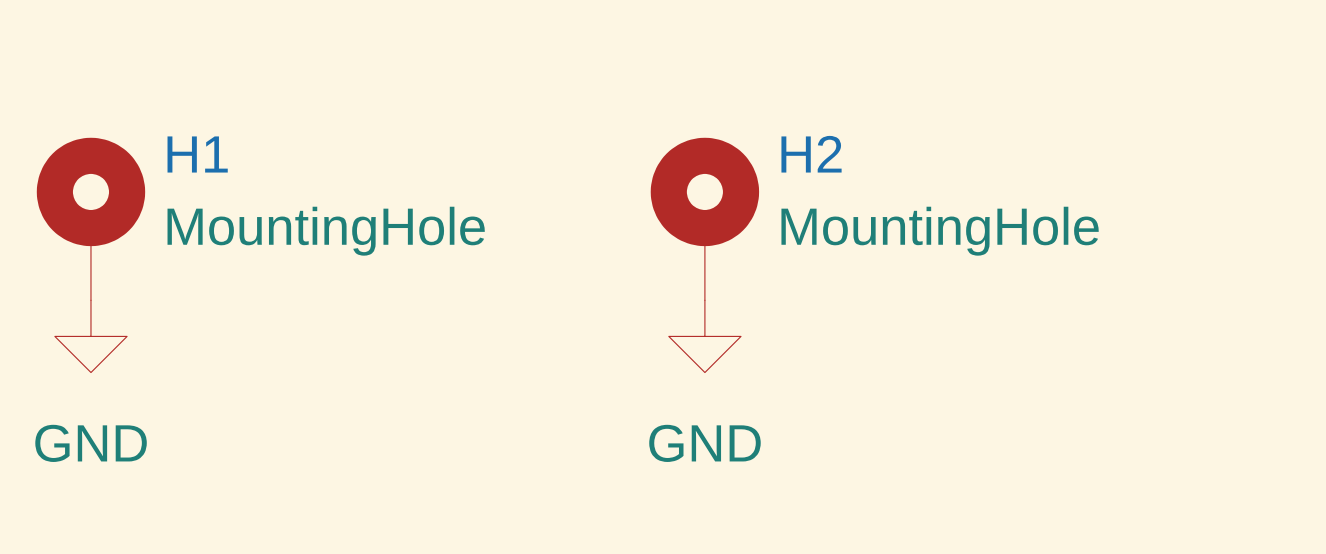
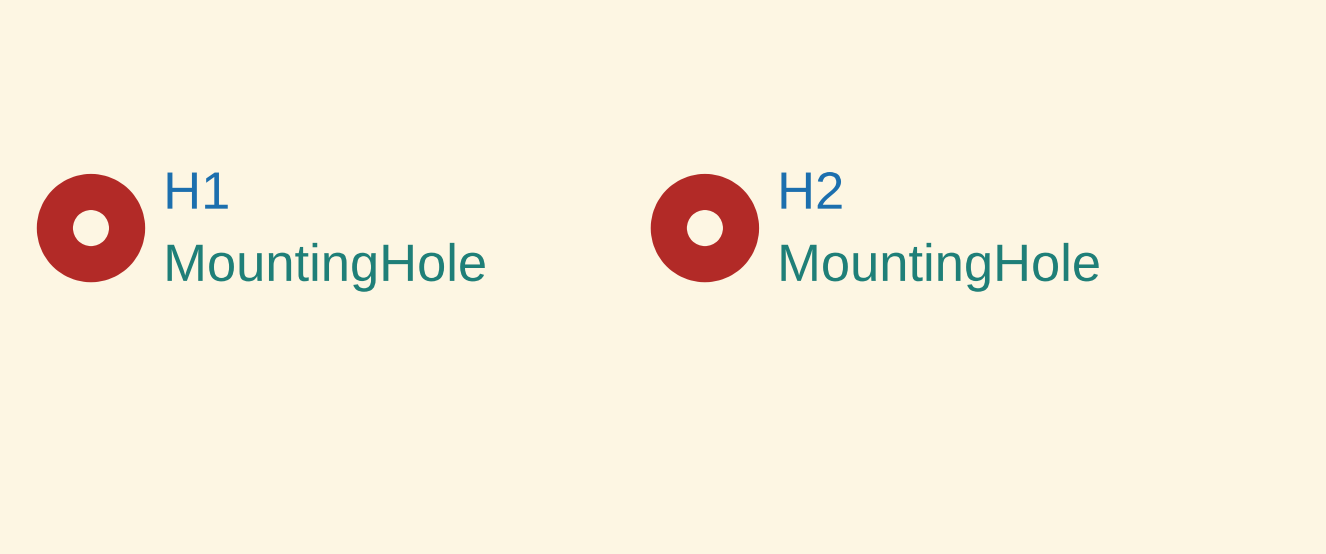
H1 symbol: [36, 137, 146, 301] -> [36, 173, 146, 283]
H2 symbol: [650, 137, 760, 301] -> [650, 173, 760, 283]
power symbol: GND (90, 336) -> none
power symbol: GND (704, 336) -> none

